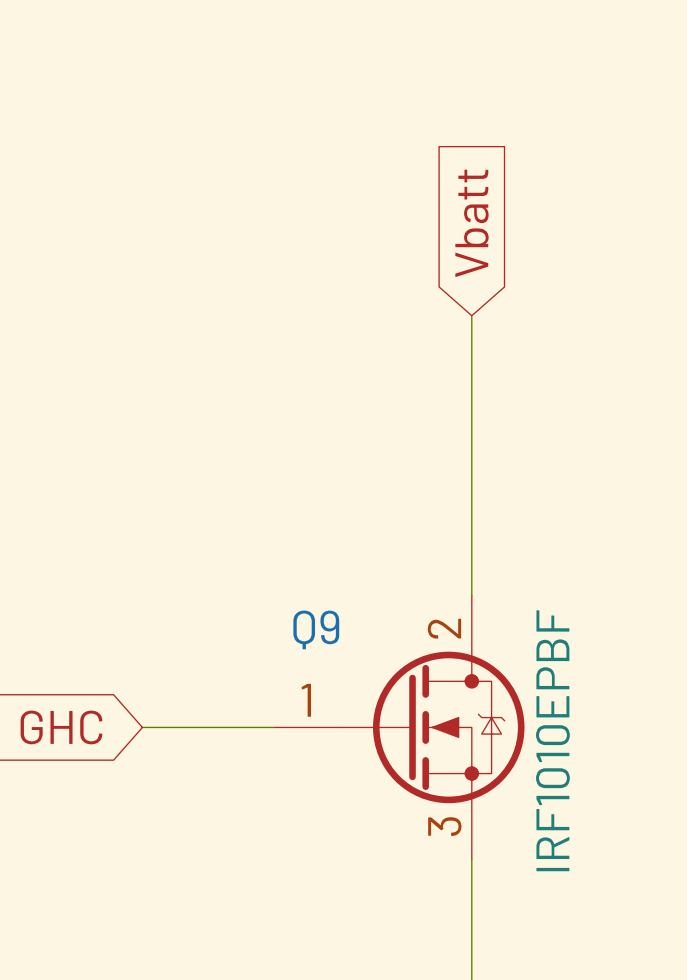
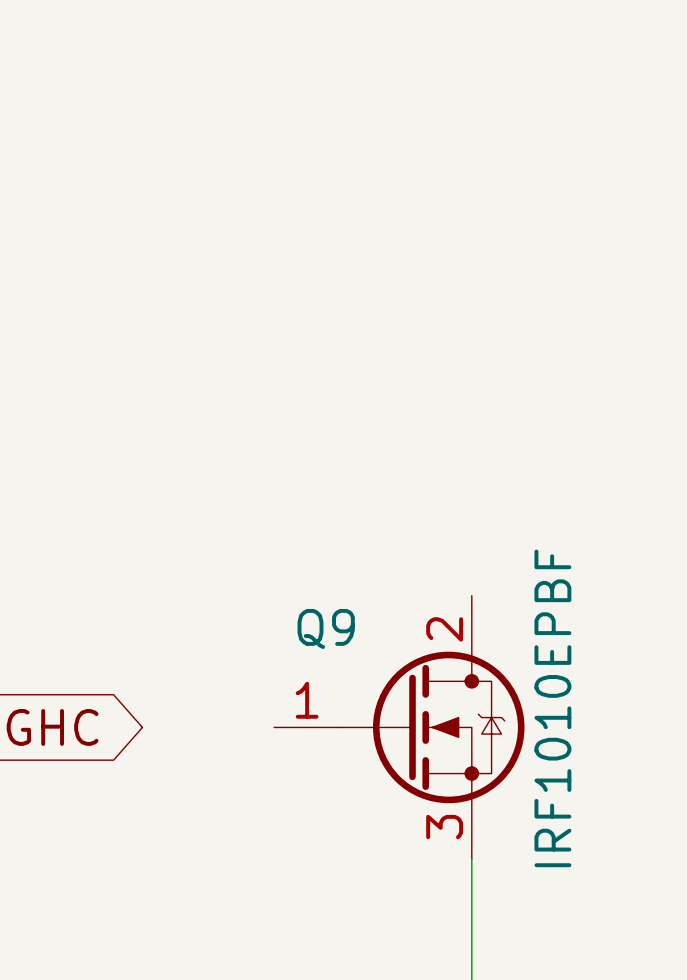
global label: Vbatt (471, 223) -> none
wire: (471, 315) (471, 595) -> none
wire: (142, 727) (274, 727) -> none

